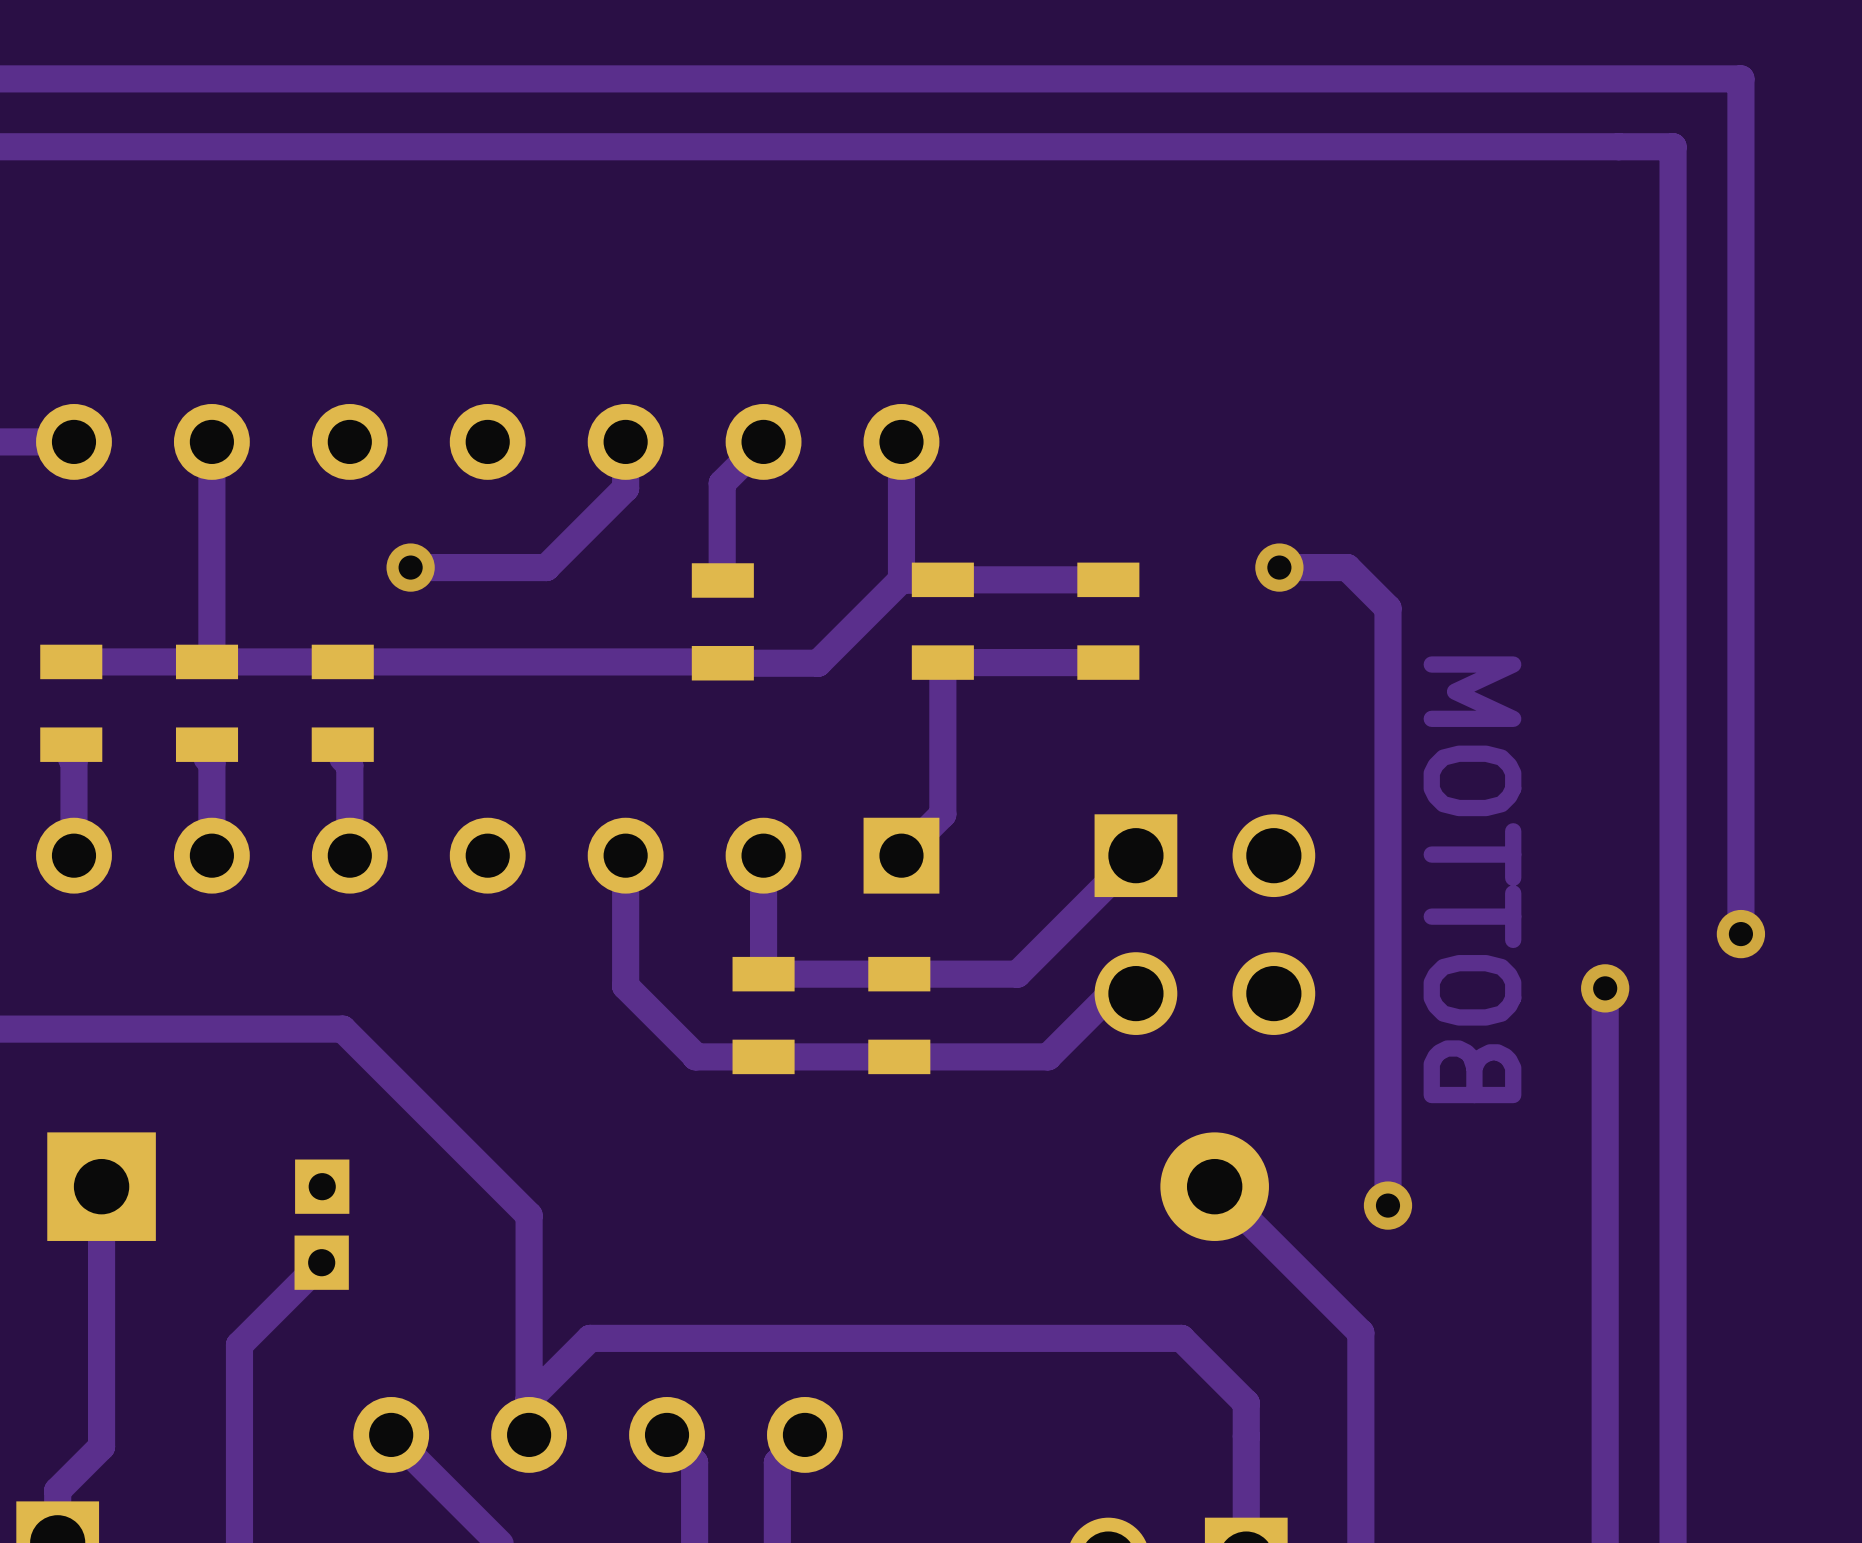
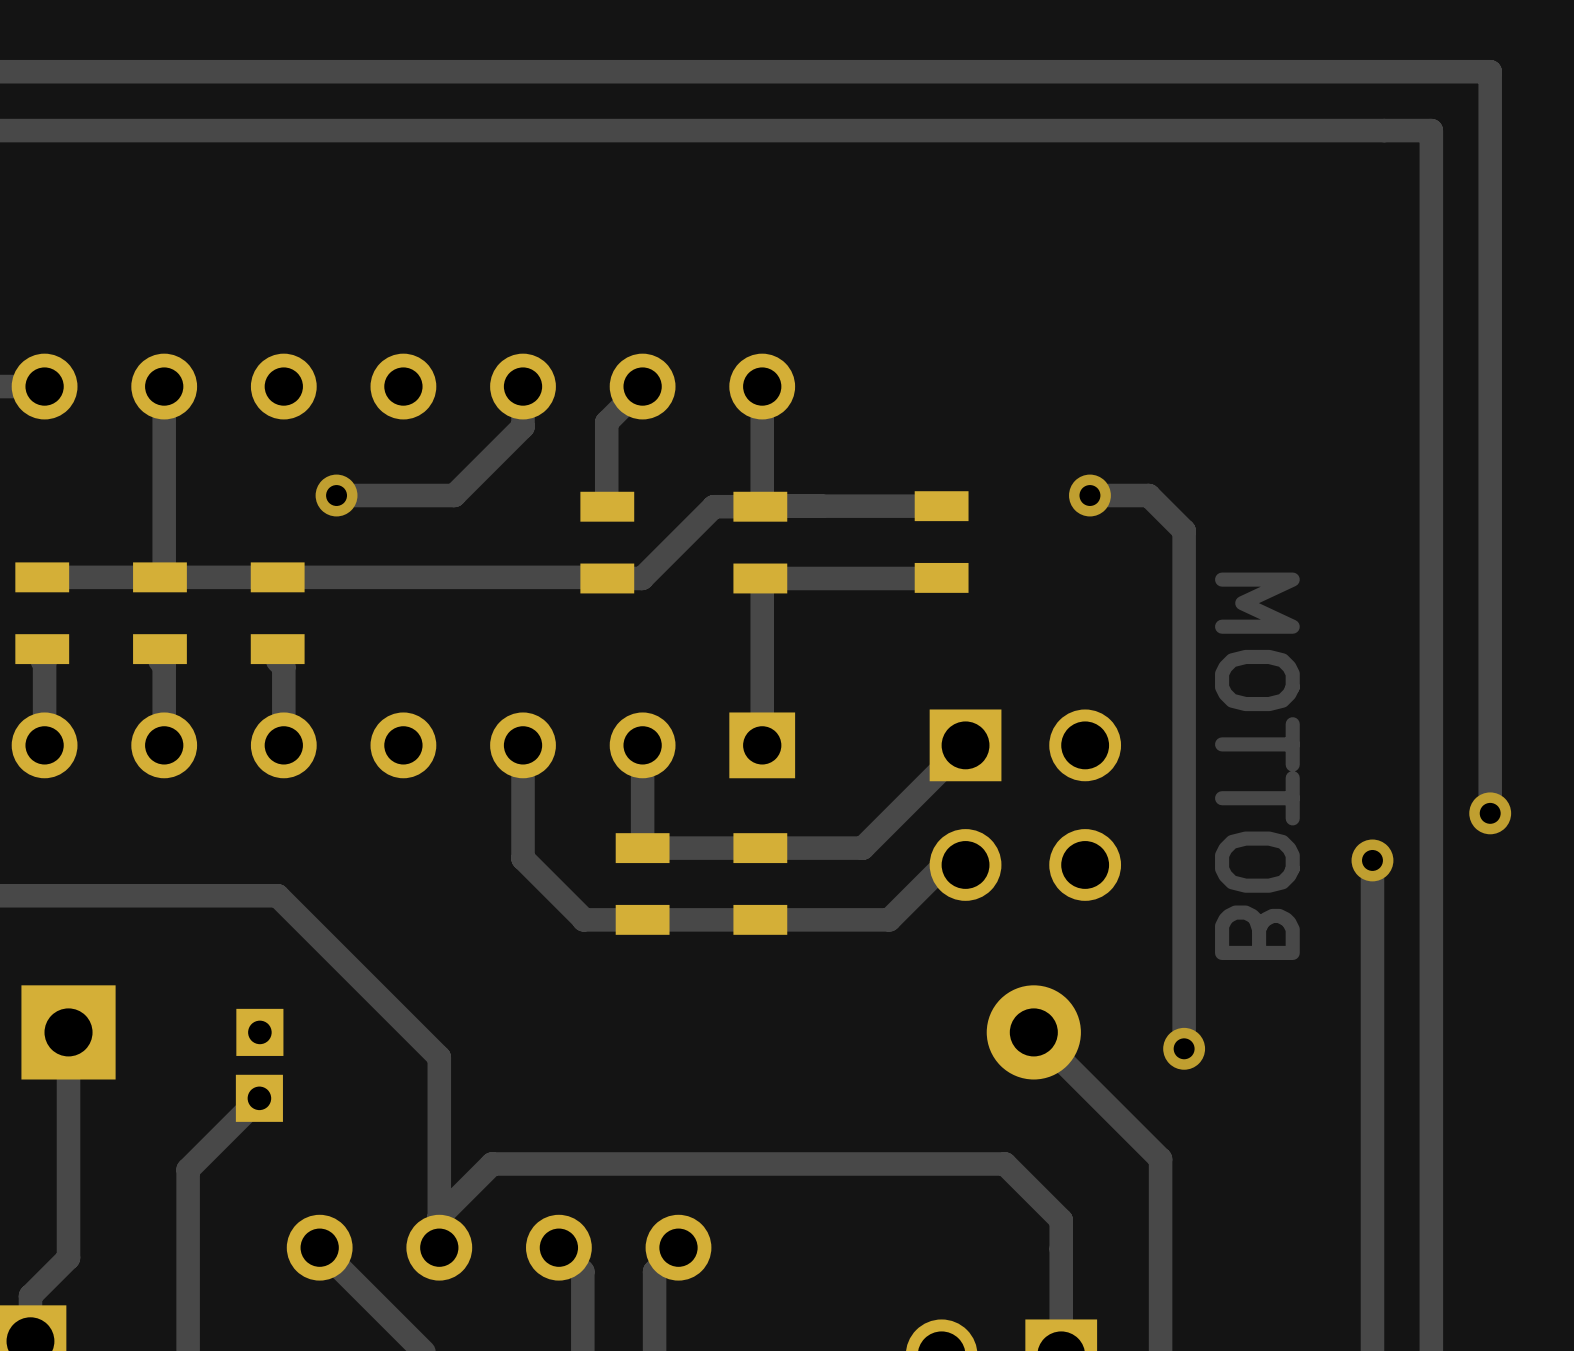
track: (901, 579) (818, 663) (762, 663) -> (760, 506) (713, 506) (642, 578)
part position: (942, 621) -> (760, 542)
track: (1108, 662) (942, 662) (942, 814) (901, 855) -> (941, 578) (760, 578) (762, 580) (762, 745)

